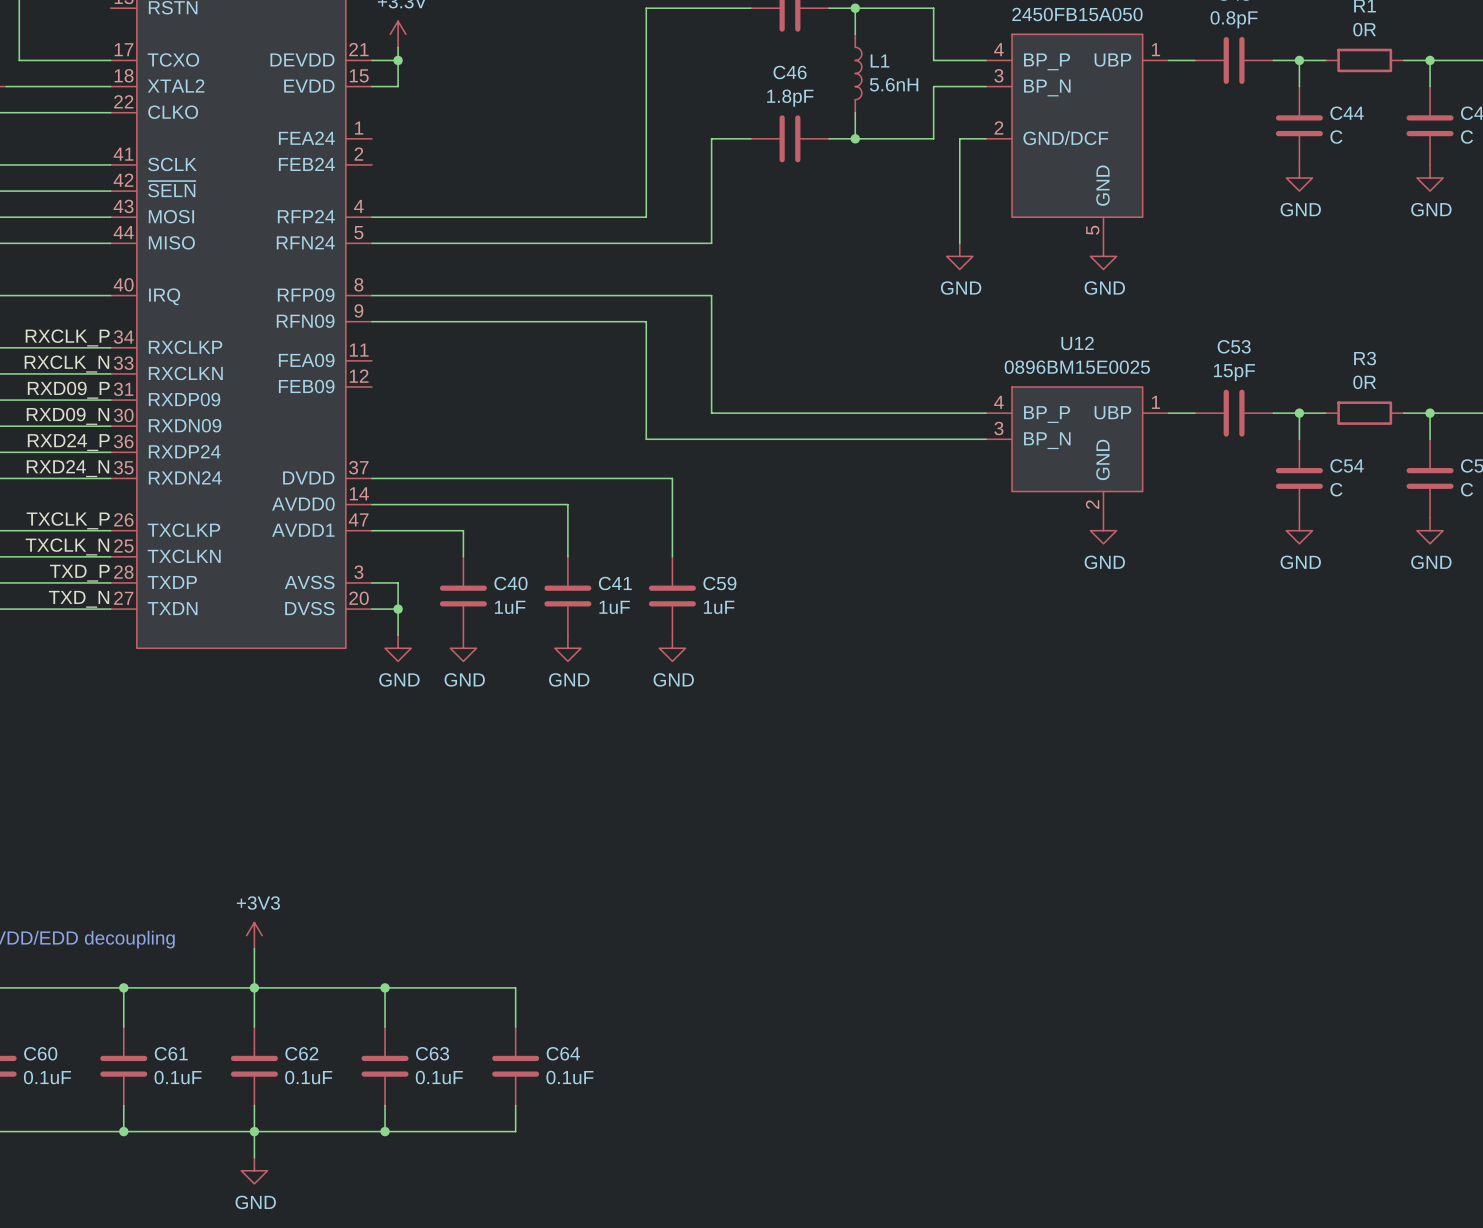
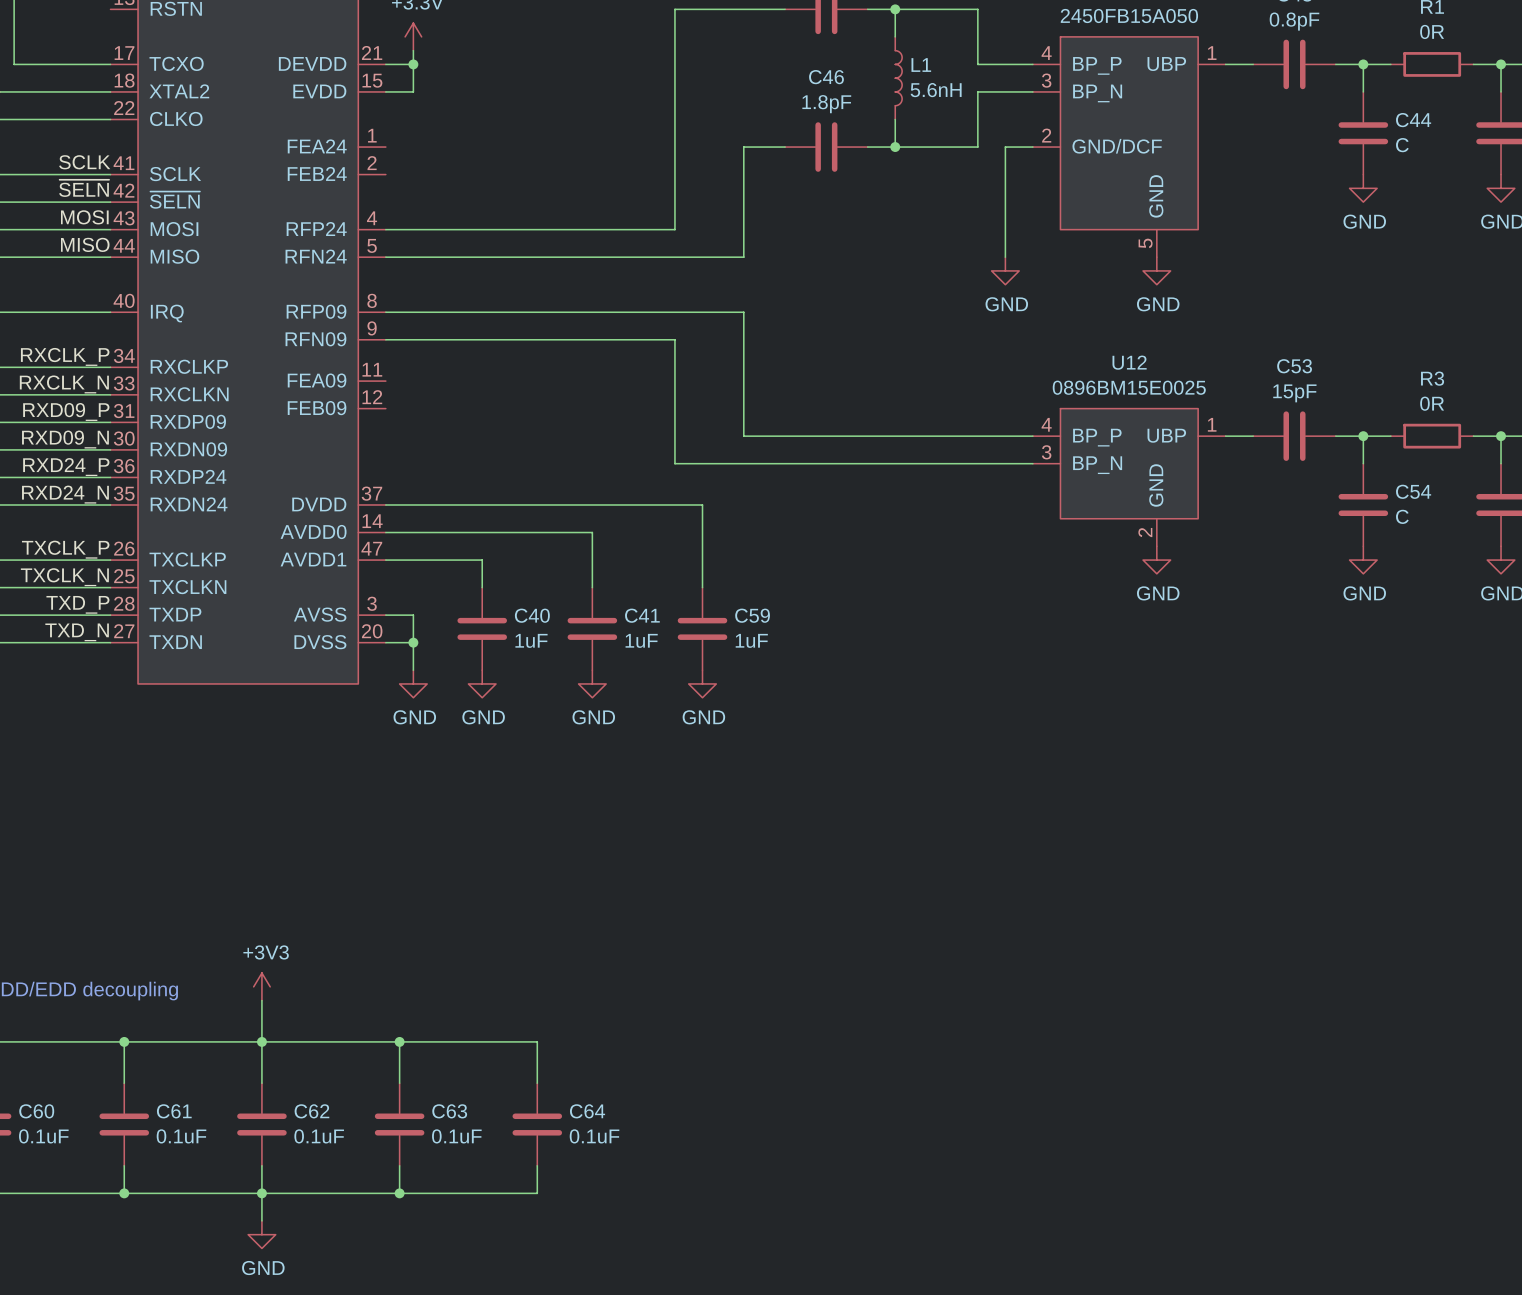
label: none -> SCLK (84, 162)
label: none -> ~{SELN} (84, 188)
label: none -> MOSI (84, 217)
label: none -> MISO (85, 244)

